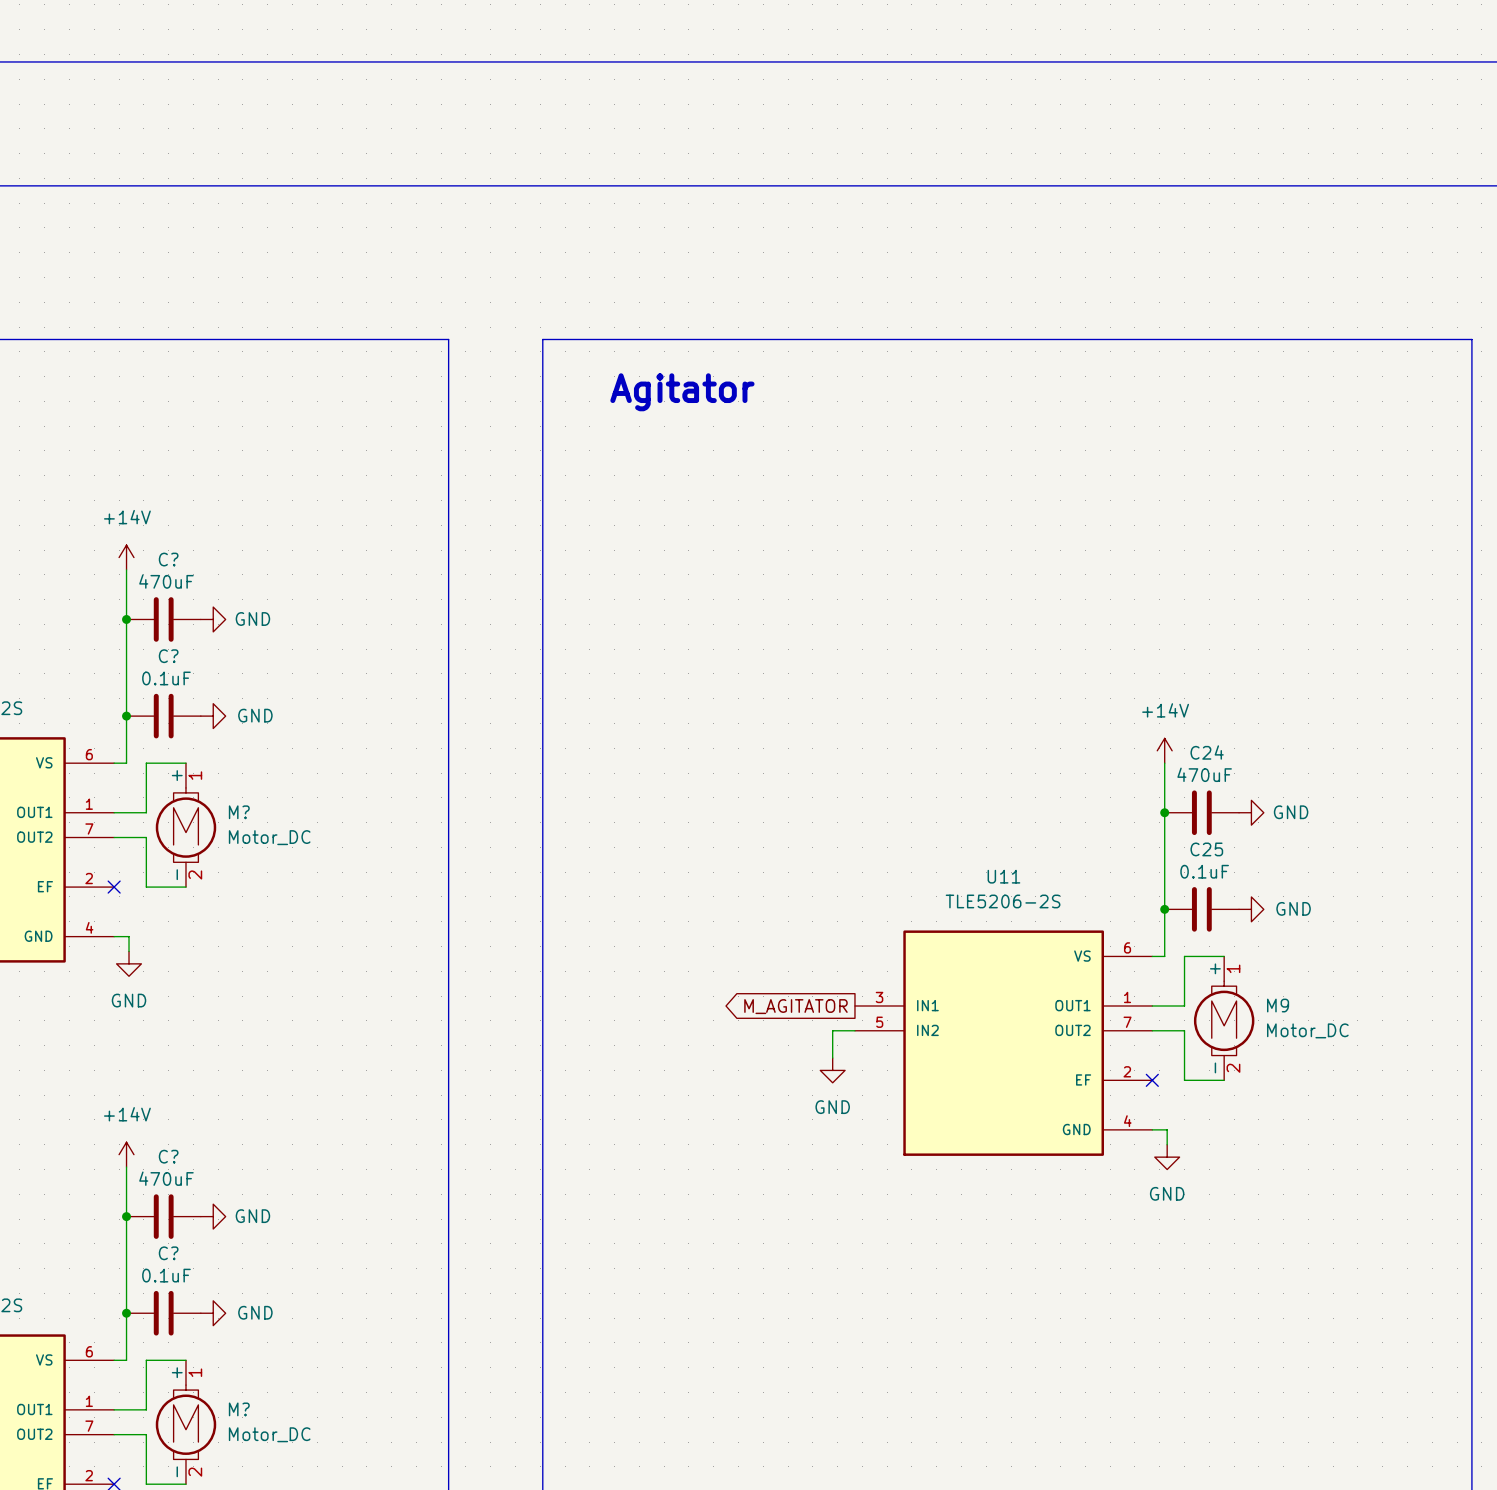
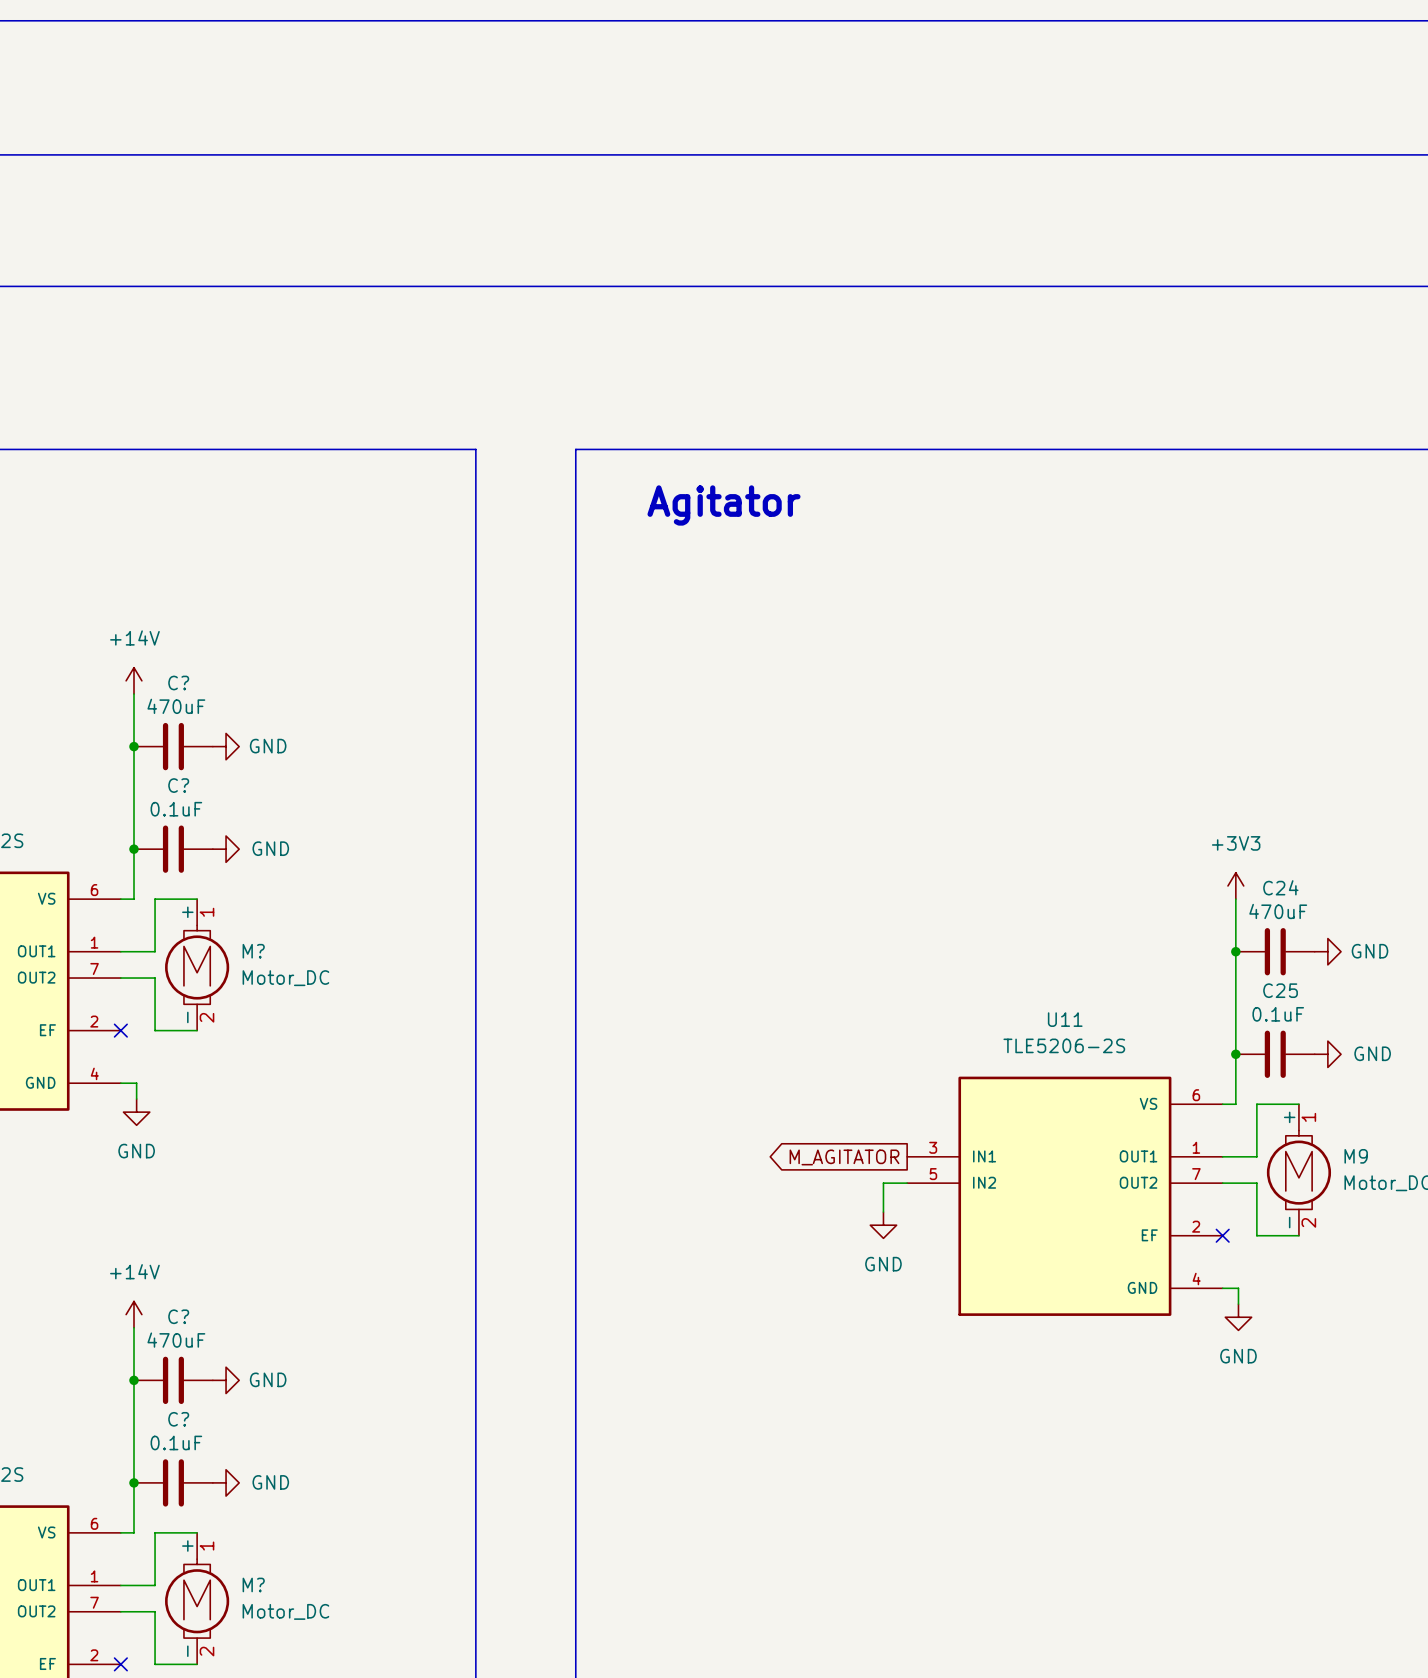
power symbol: +14V (1164, 750) -> +3V3 (1235, 885)

